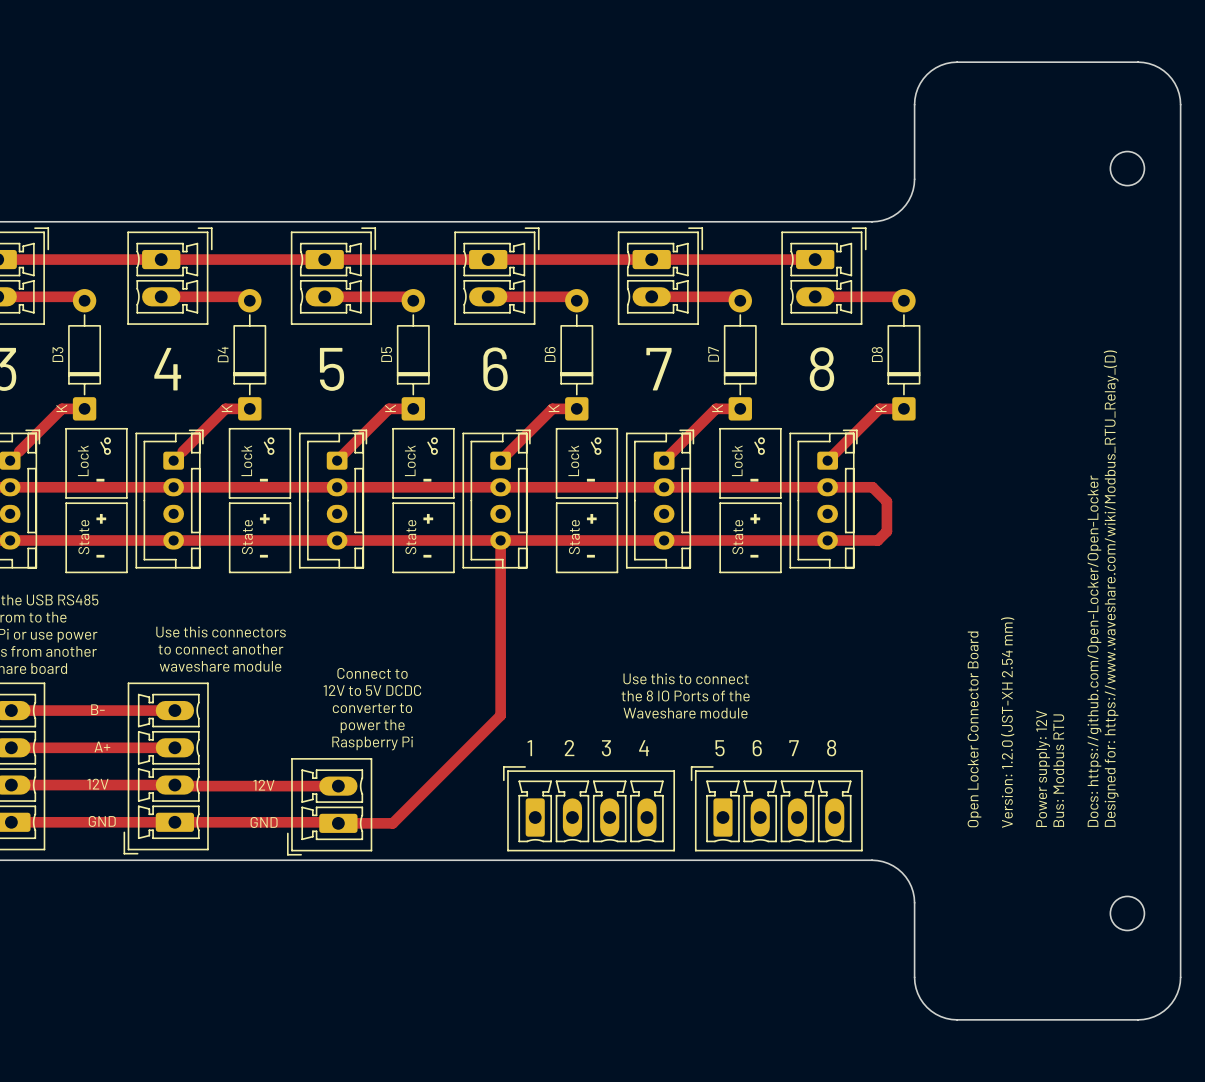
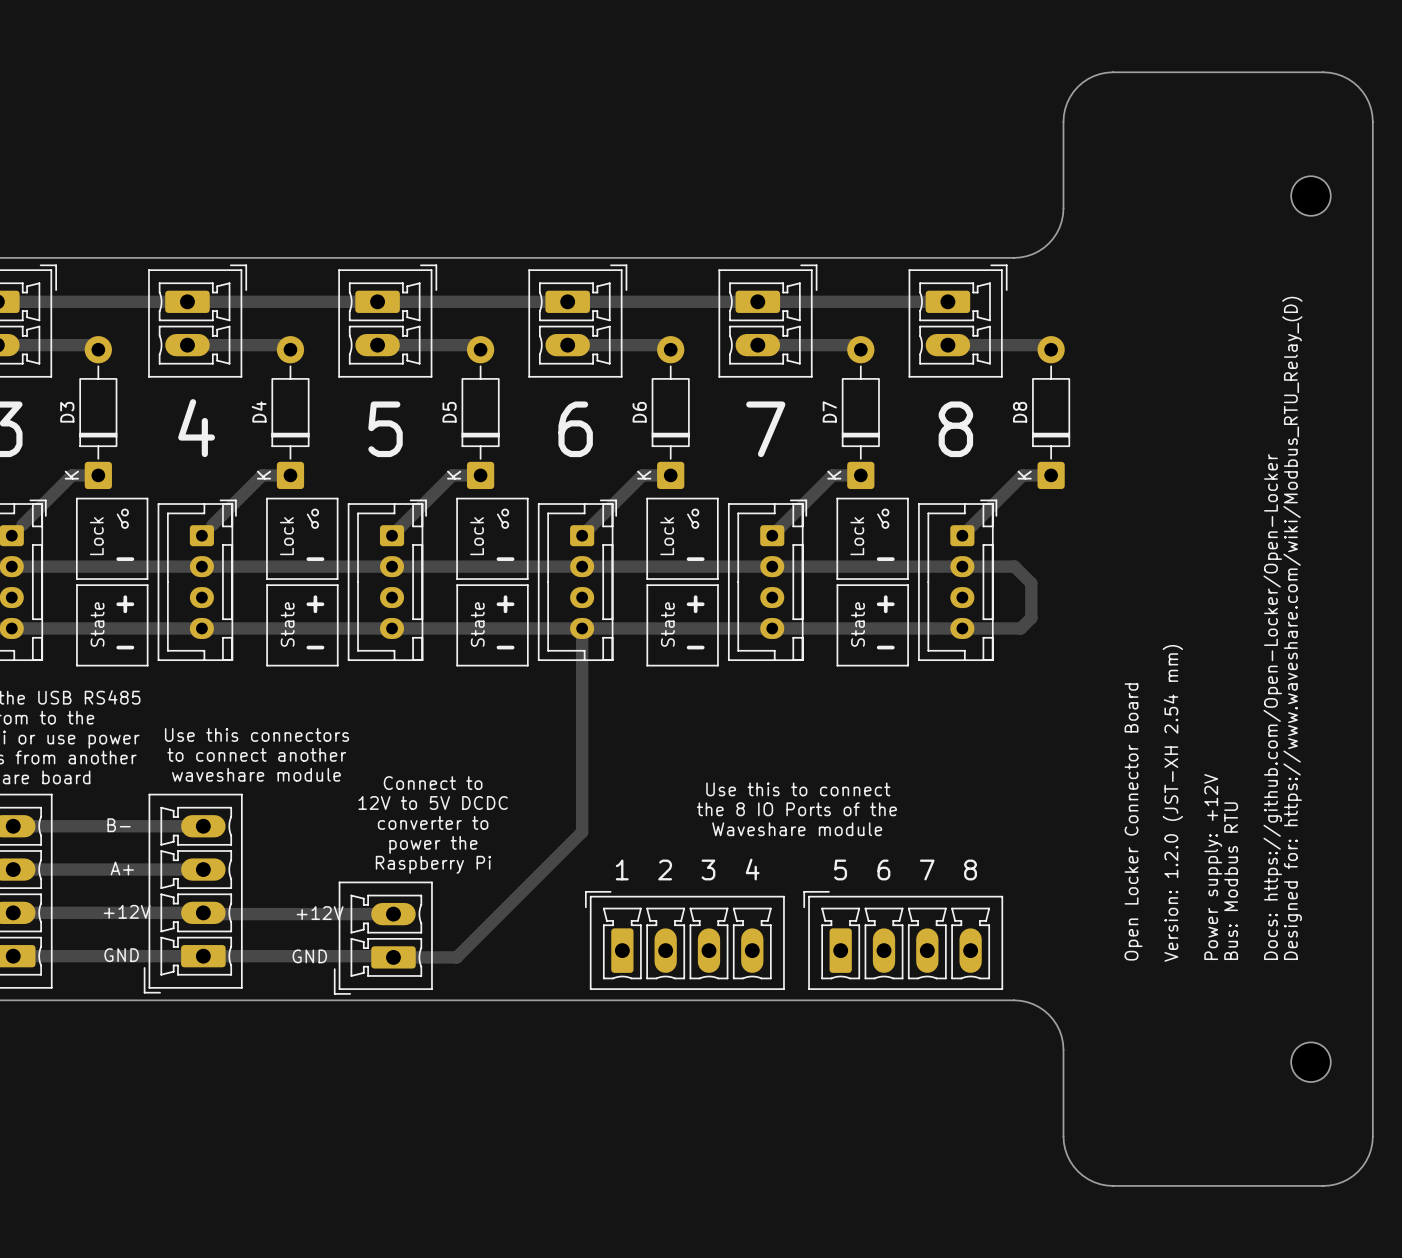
text: Power supply: 12V (1043, 768) -> Power supply: +12V (1213, 867)
text: 12V (97, 784) -> +12V (127, 911)
text: 12V (263, 785) -> +12V (320, 913)

